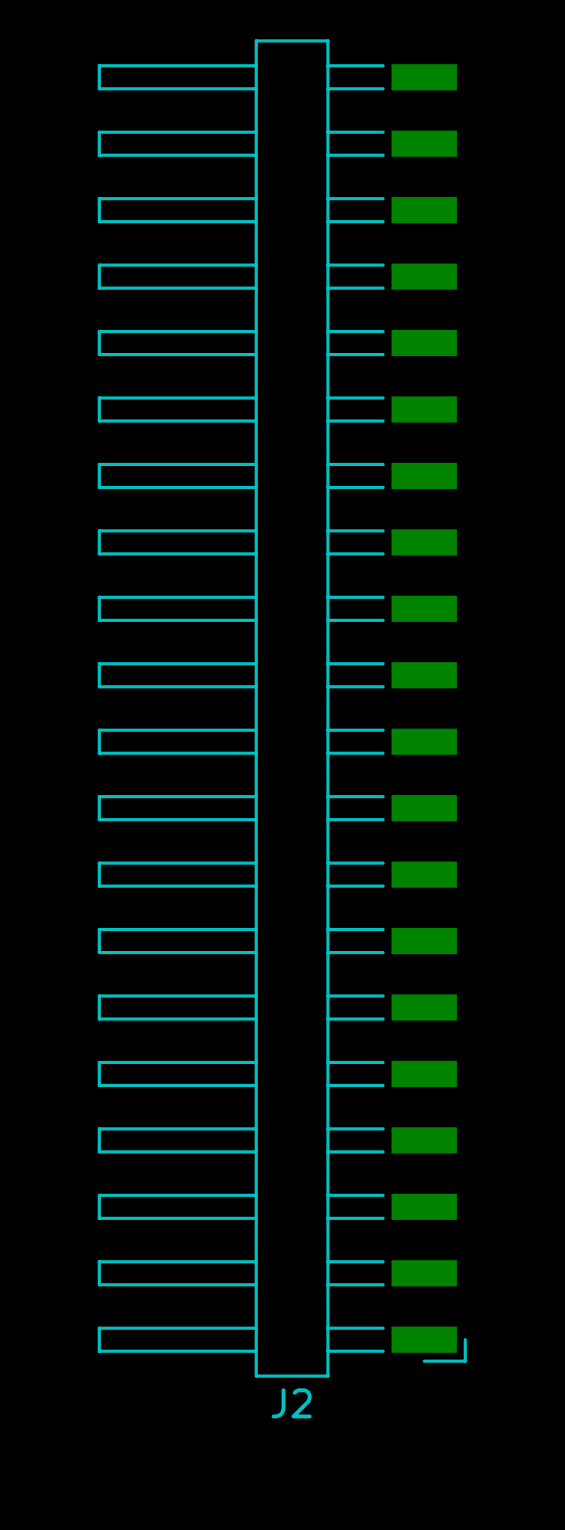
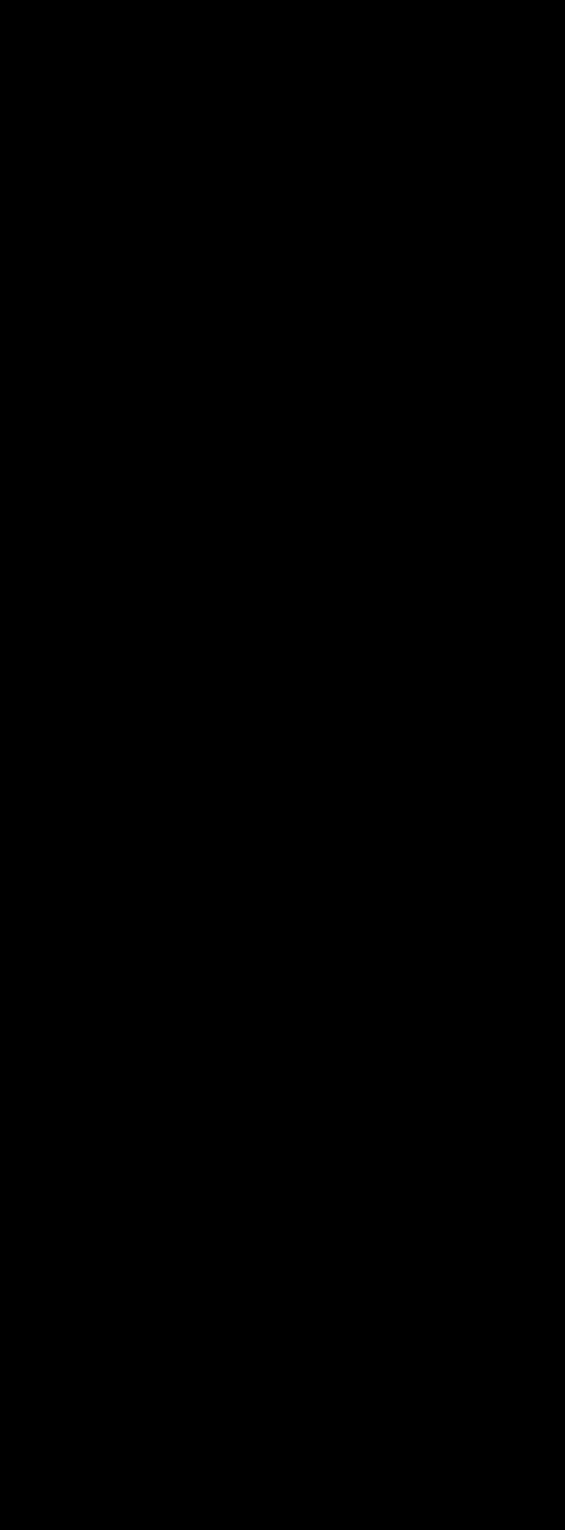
J2: (282, 708) -> none

